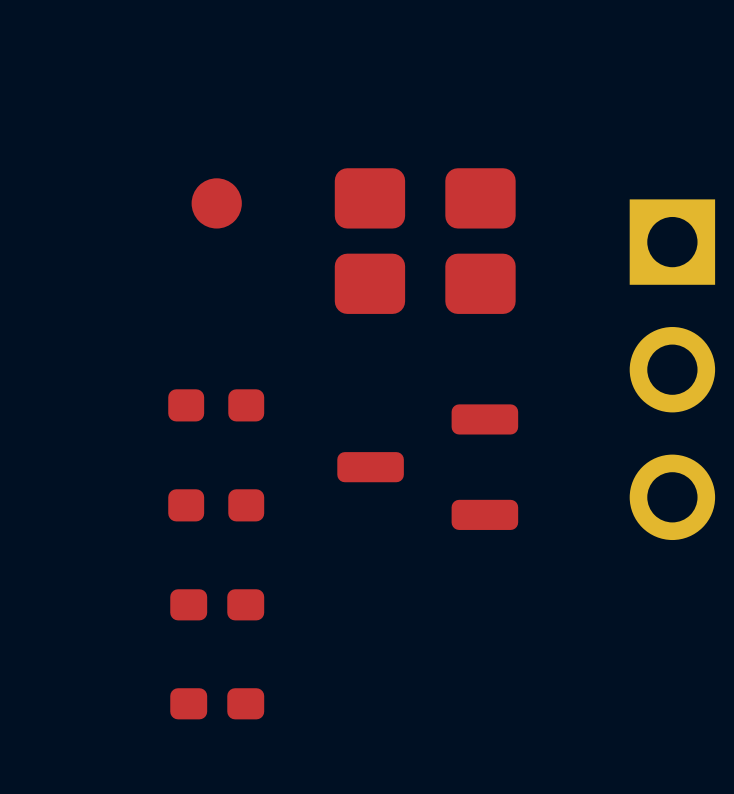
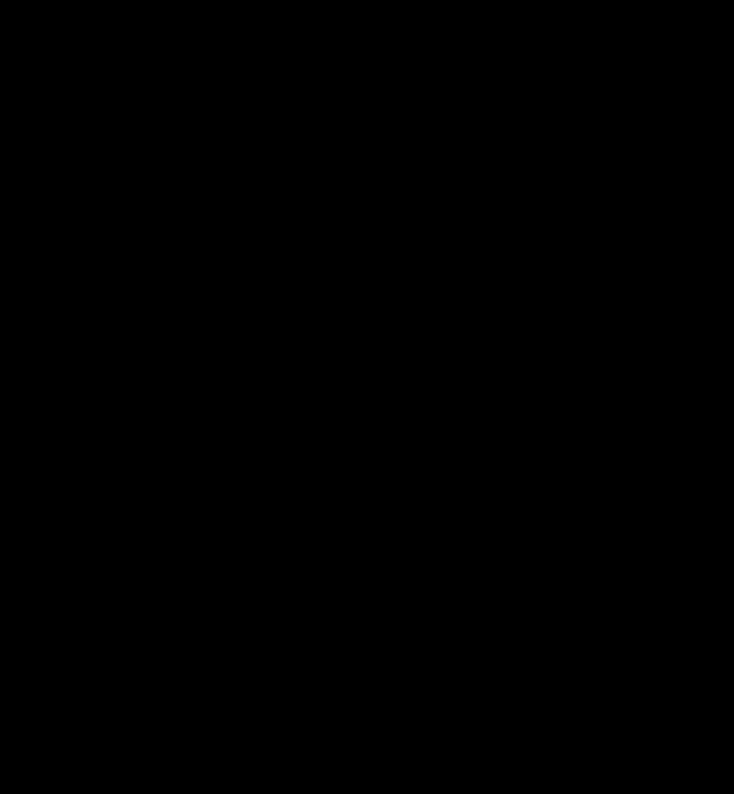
part: (216, 203) -> none
part: (425, 241) -> none
part: (672, 369) -> none
part: (216, 405) -> none
part: (427, 467) -> none
part: (216, 505) -> none
part: (217, 604) -> none
part: (217, 703) -> none

